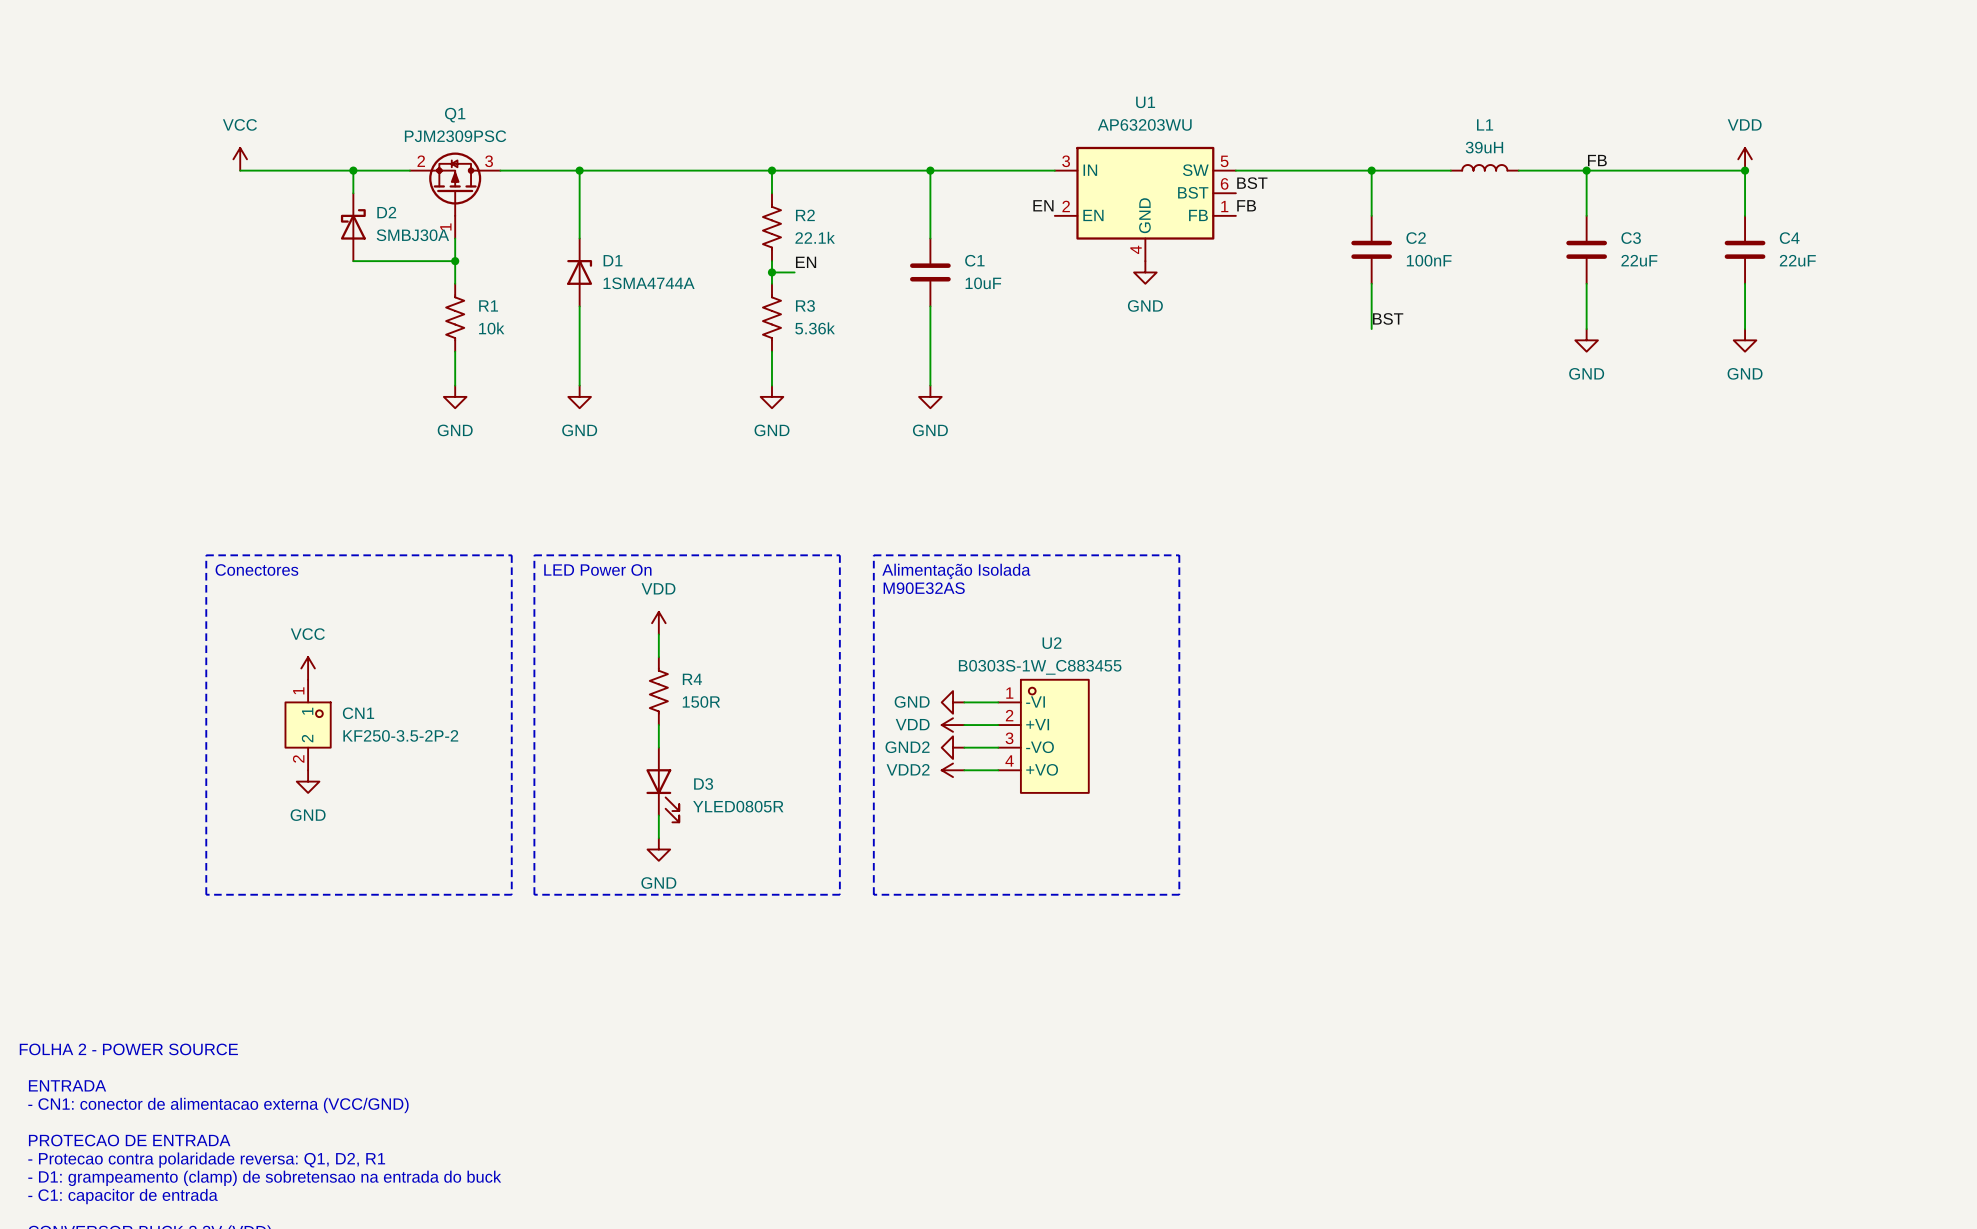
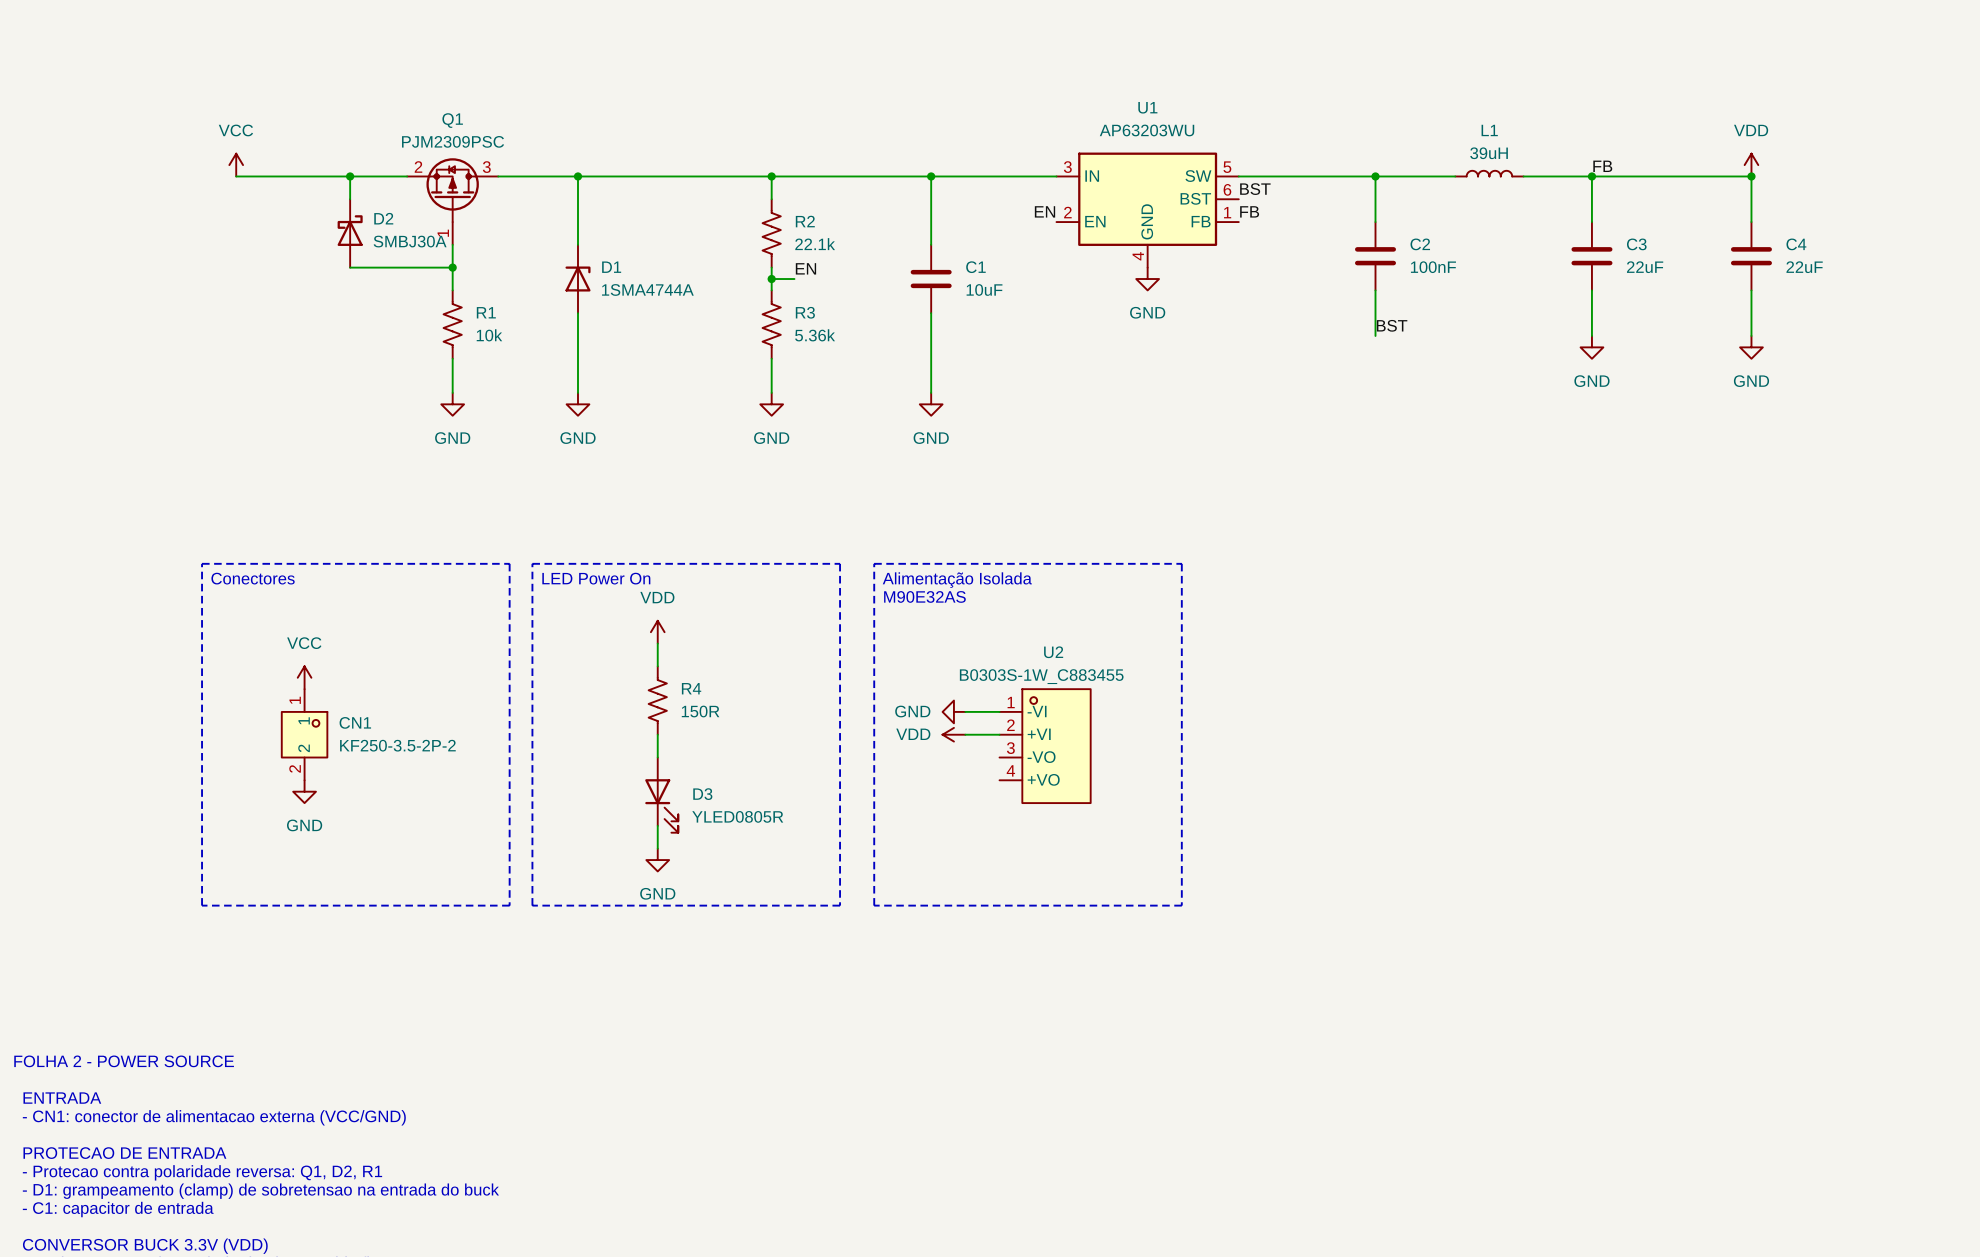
power symbol: GND2 (953, 747) -> none
wire: (964, 747) (998, 747) -> none
power symbol: VDD2 (953, 770) -> none
wire: (964, 770) (998, 770) -> none

